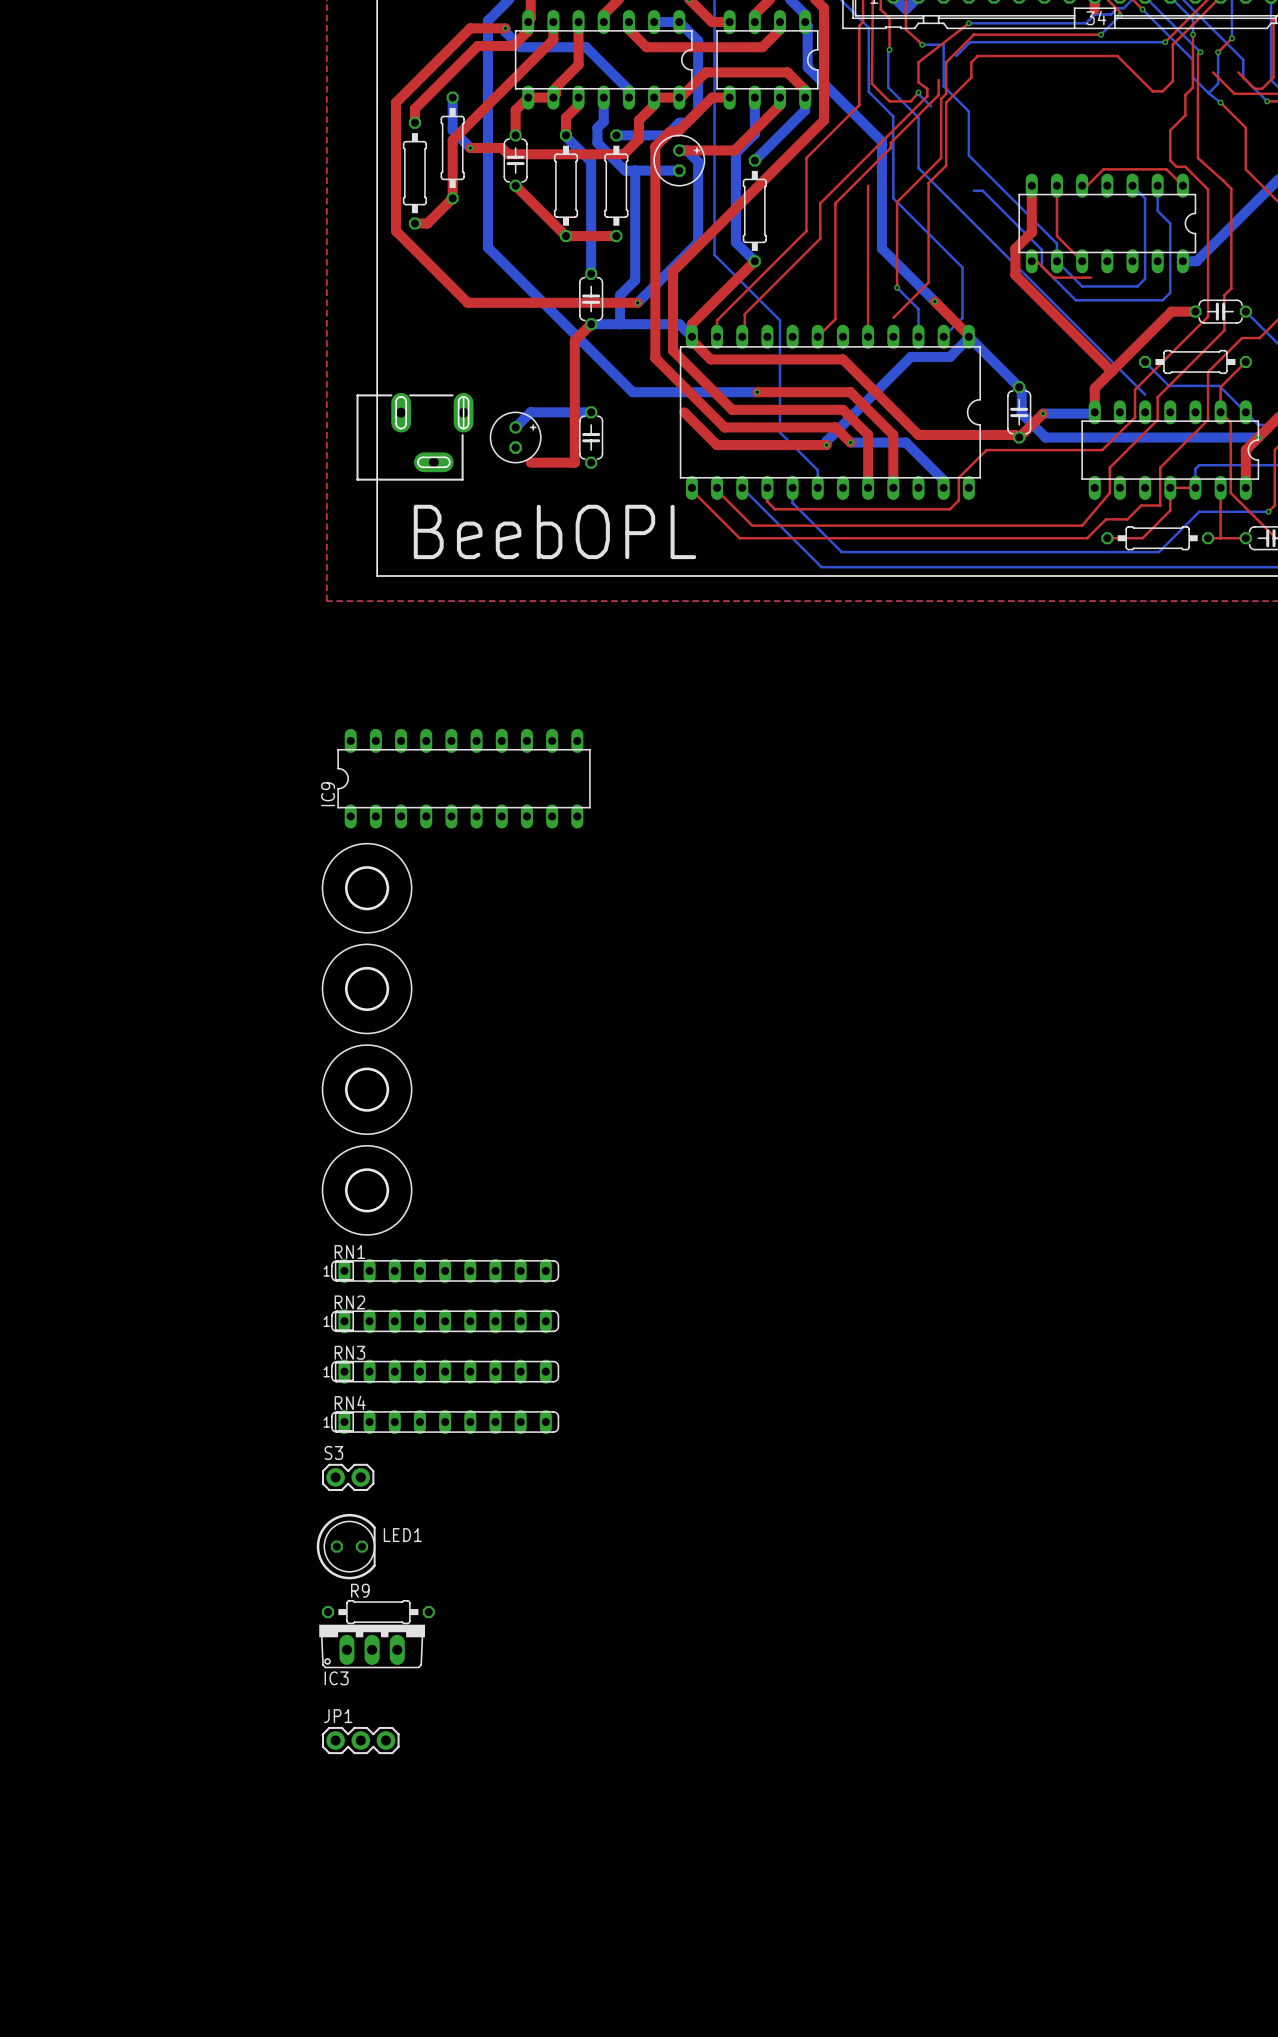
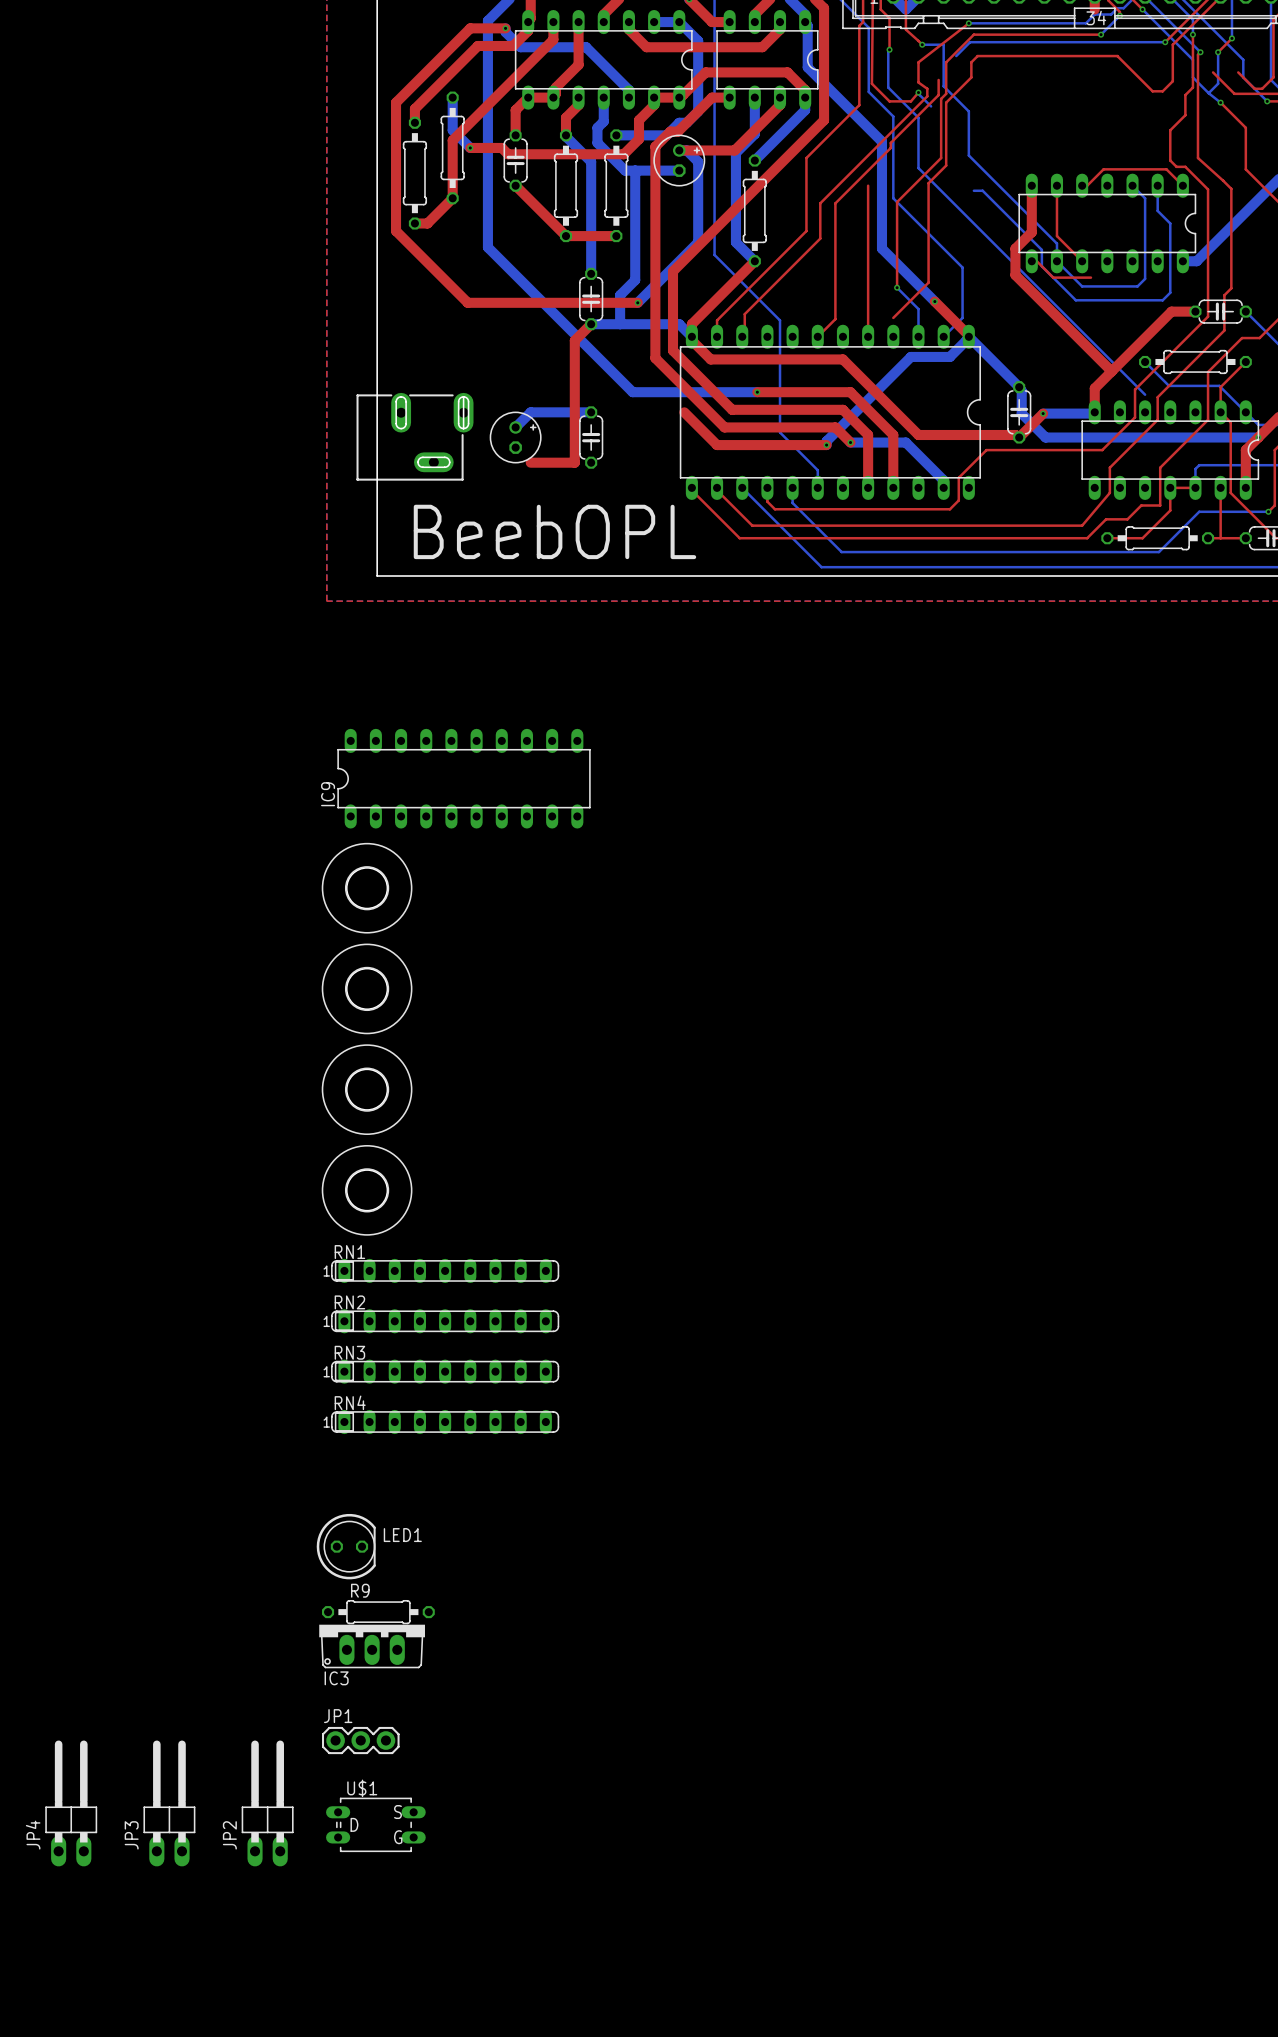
S3: (348, 1477) -> none
JP4: none -> (71, 1803)
JP3: none -> (169, 1803)
JP2: none -> (267, 1803)
U$1: none -> (375, 1824)

